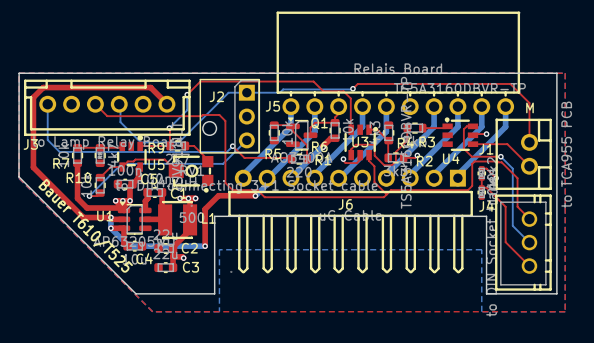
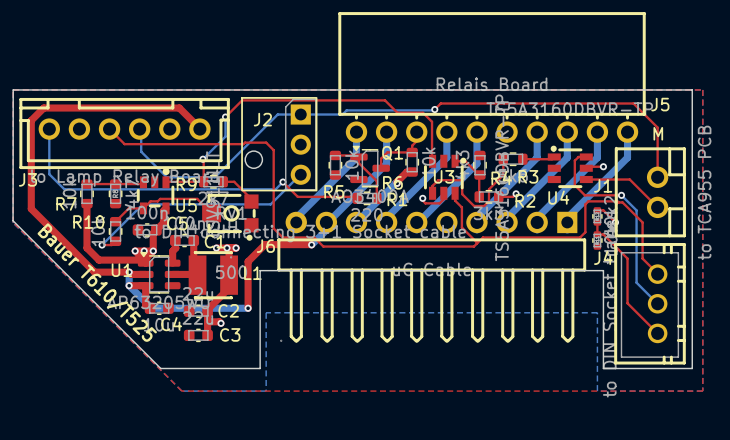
J5 name position: J5 (272, 106) -> J5 (660, 104)
J6 name position: J6 (345, 204) -> J6 (265, 246)

